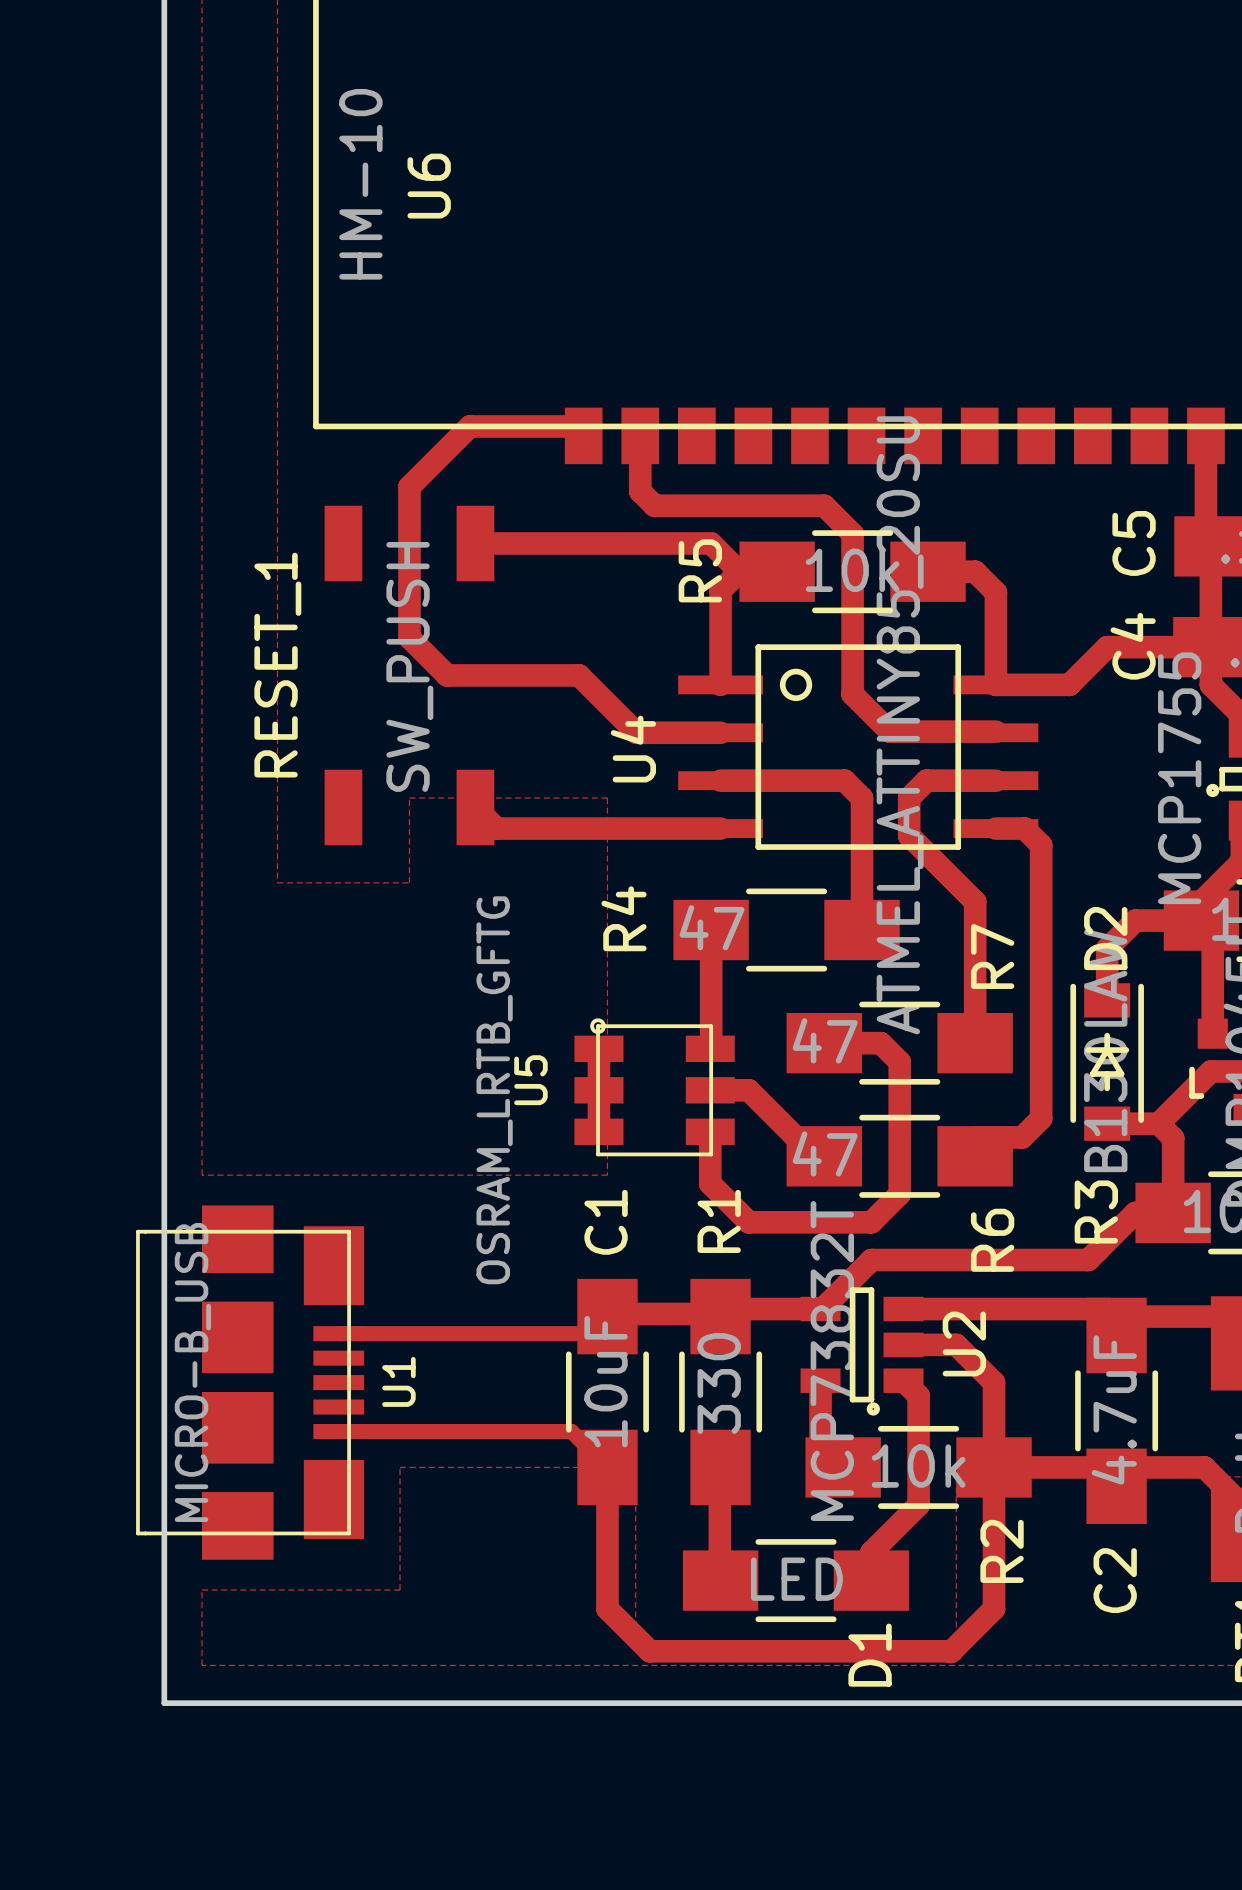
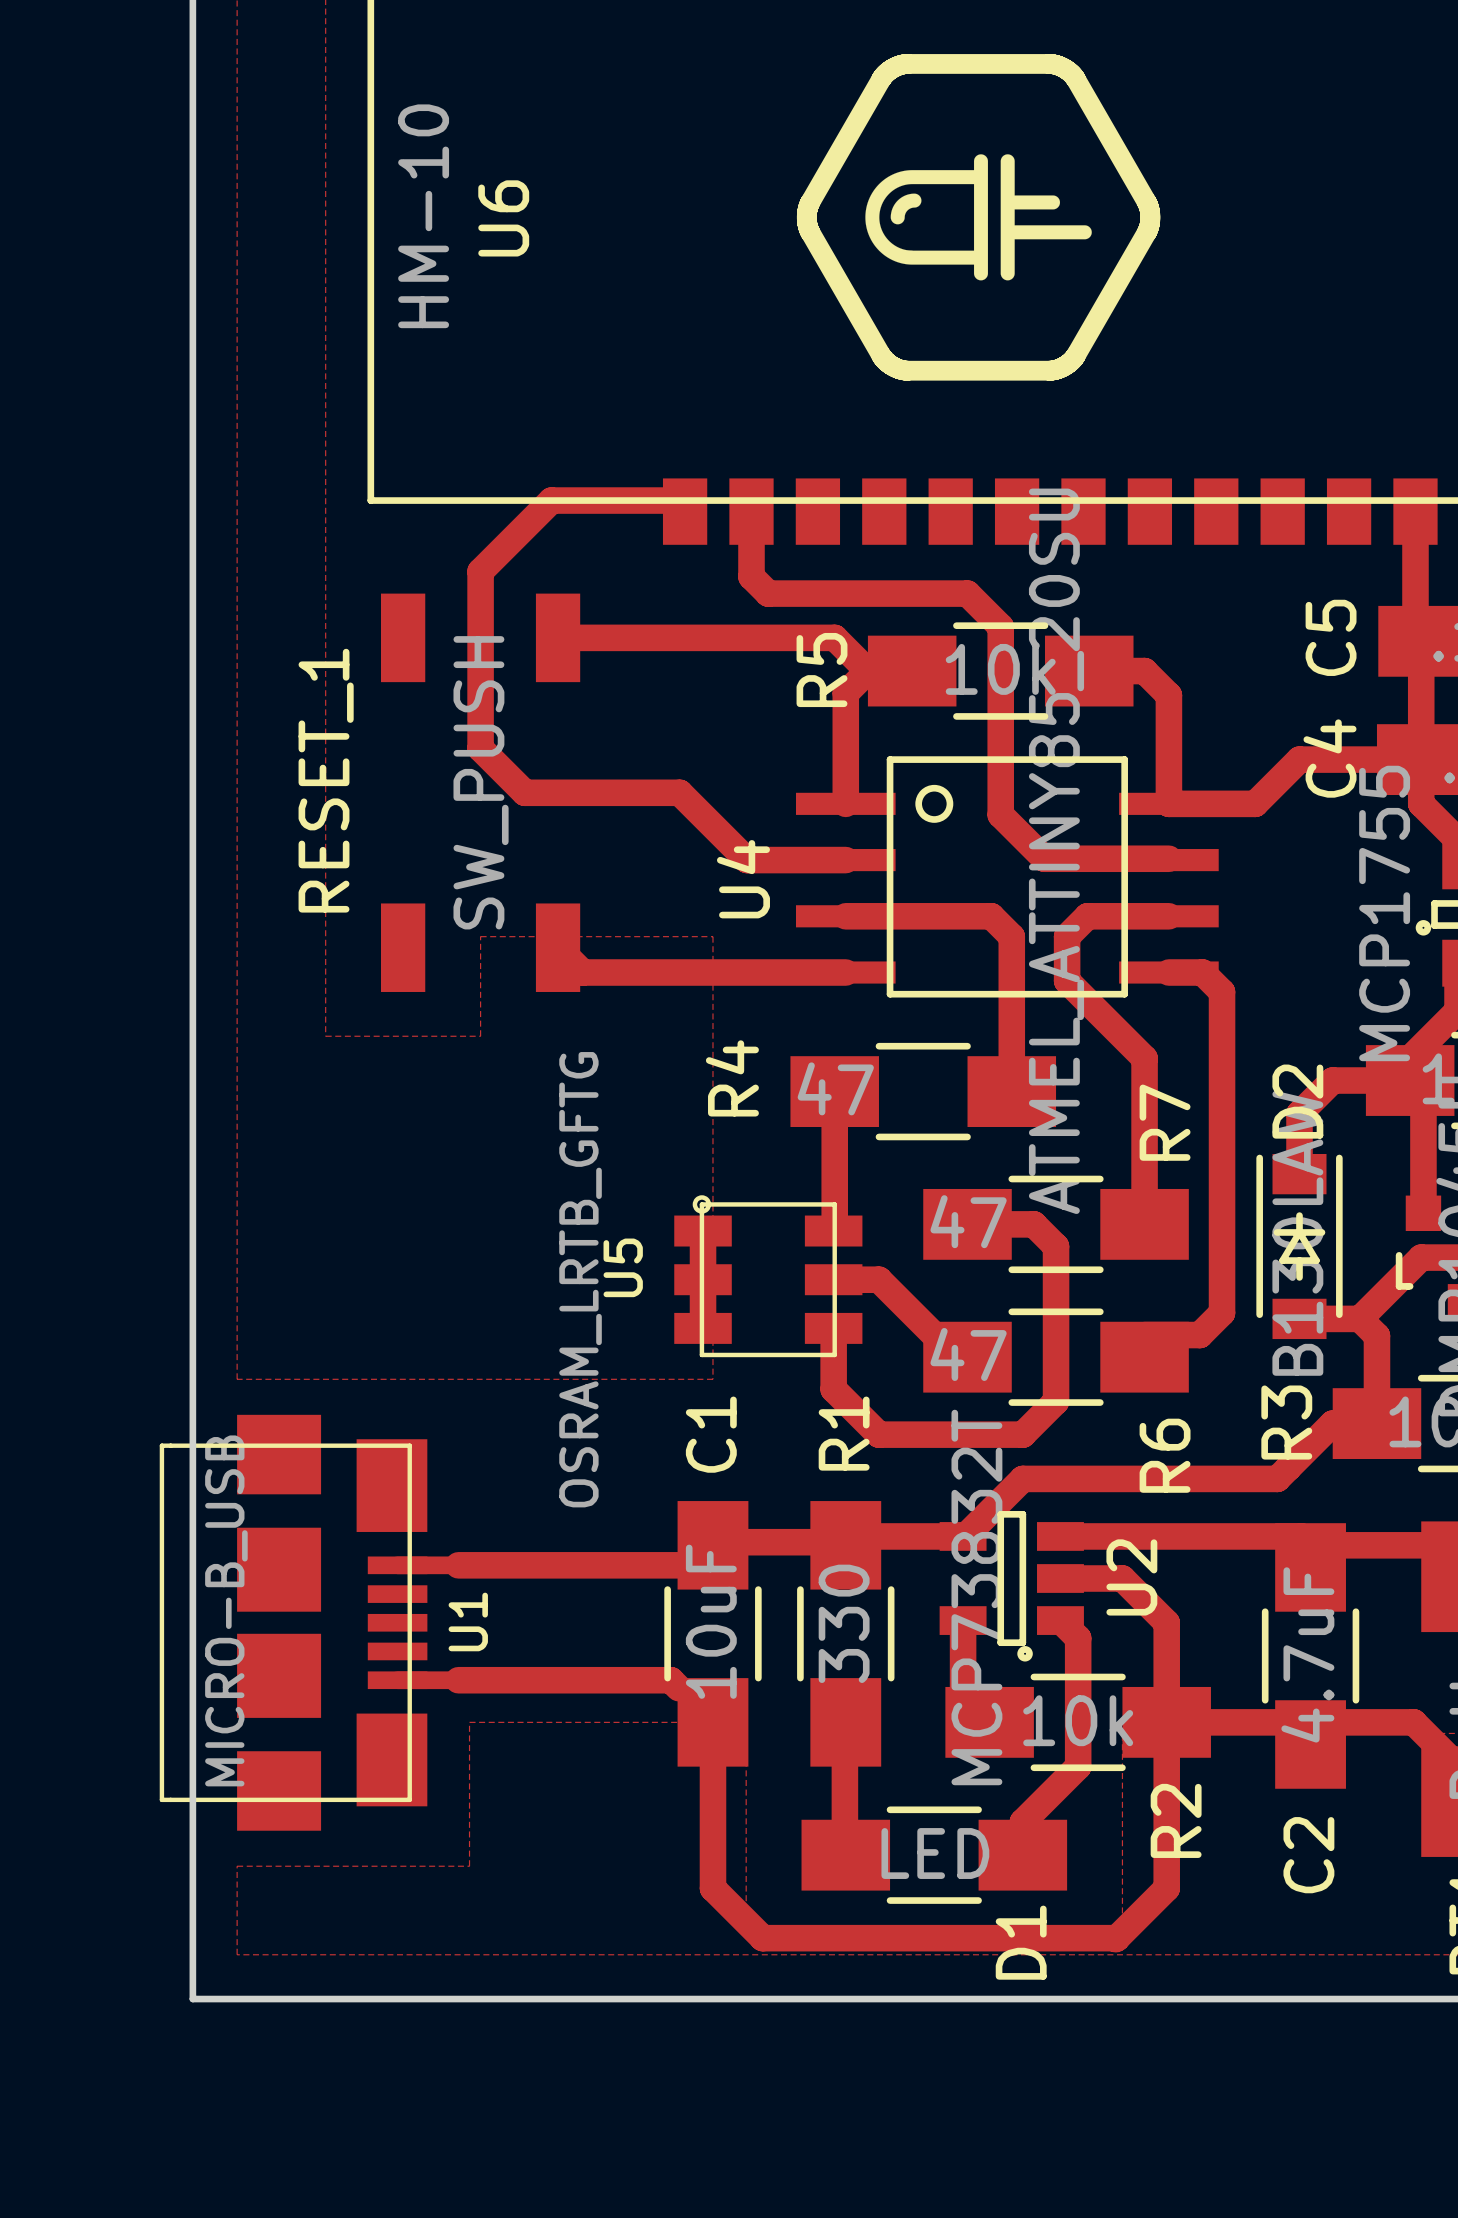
drawing: none -> [796, 54, 1161, 381]
track width: thin (390, 1333) (585, 1333) -> thick (458, 1565) (686, 1565)
track width: thin (390, 1431) (571, 1431) (578, 1438) -> thick (458, 1680) (670, 1680) (678, 1688)

